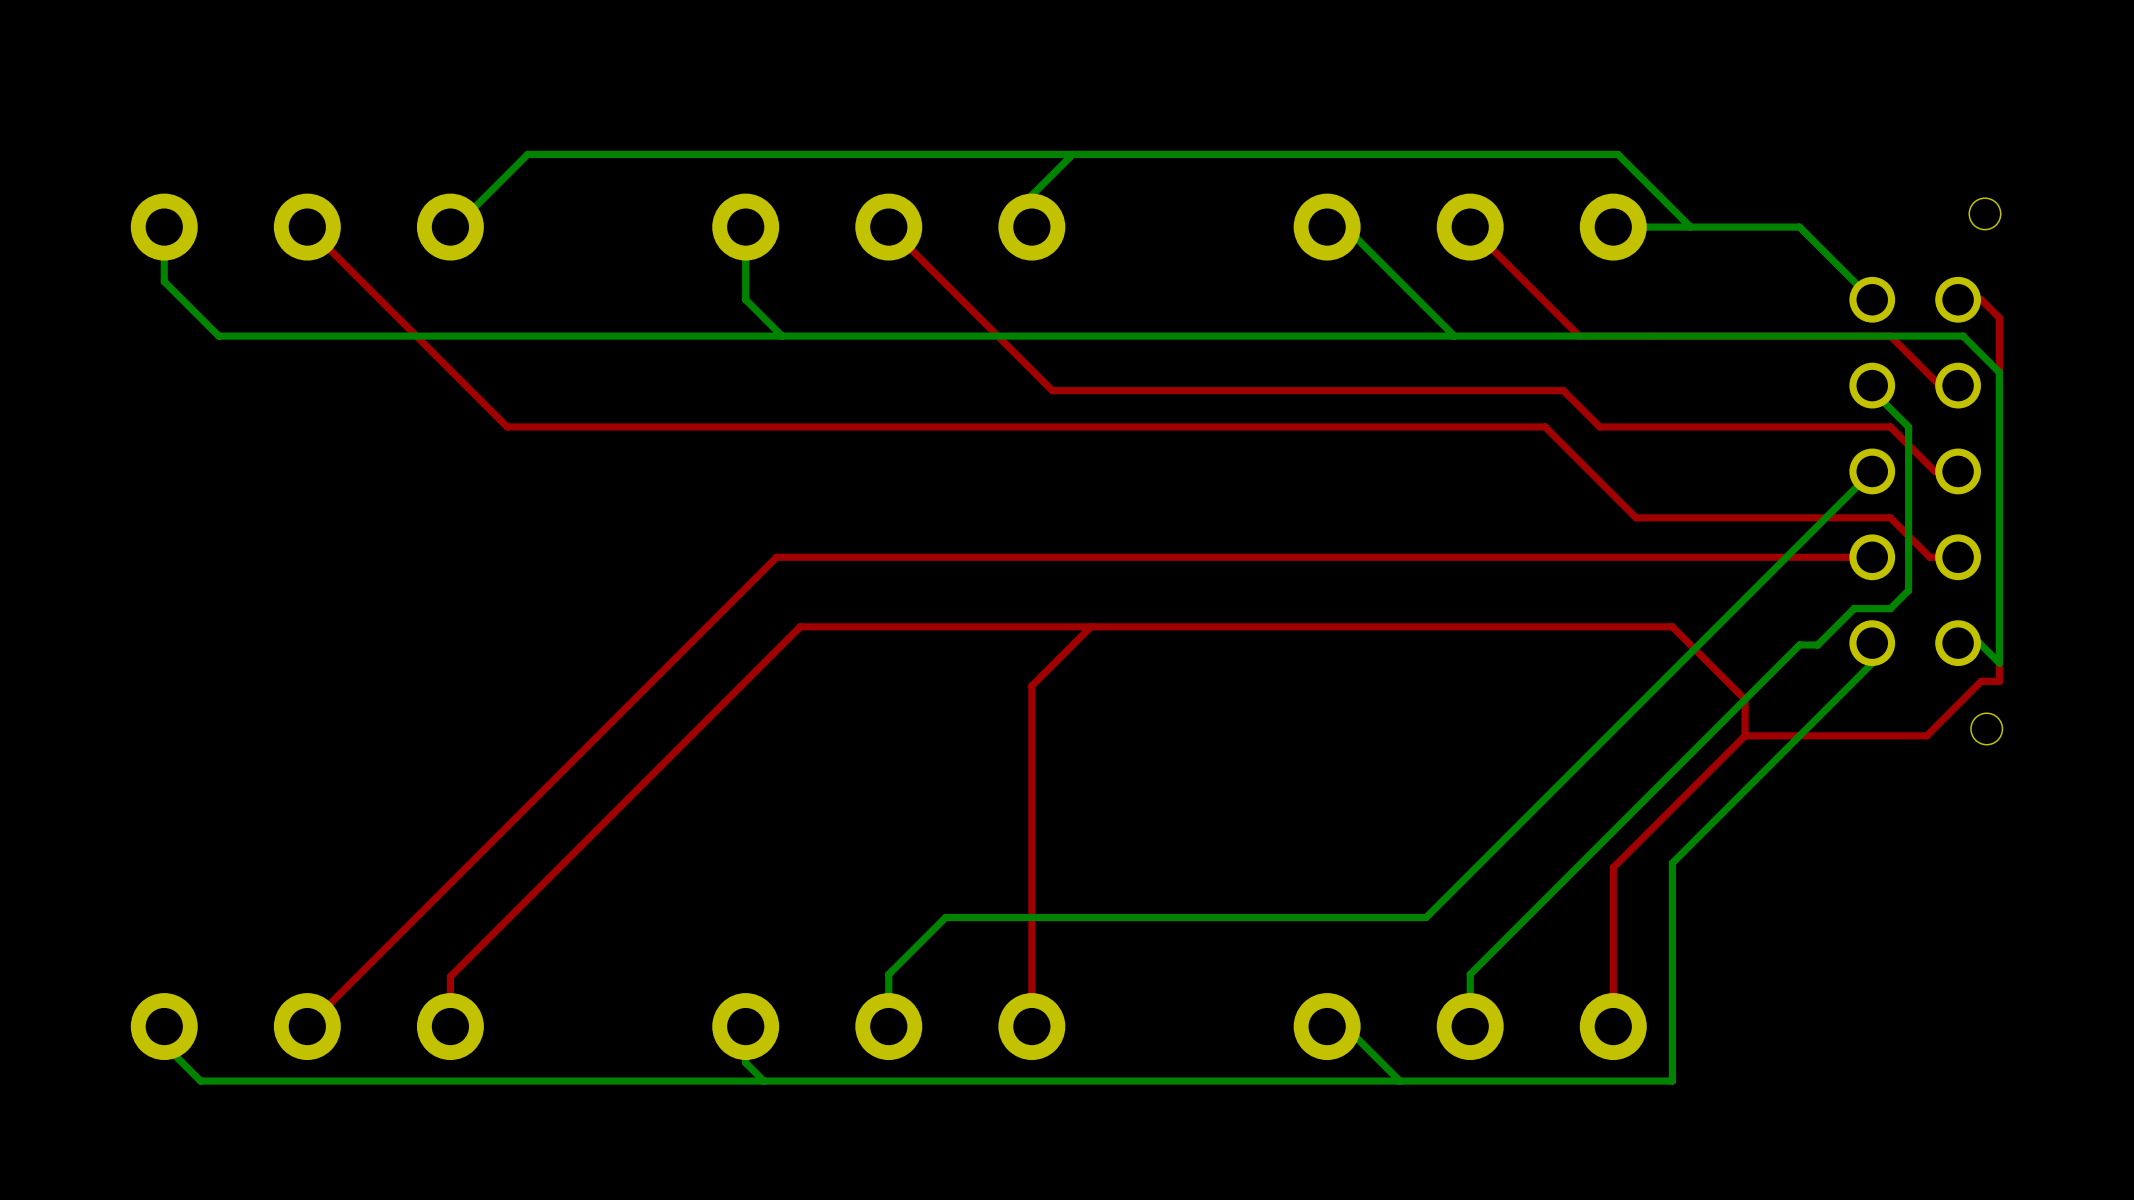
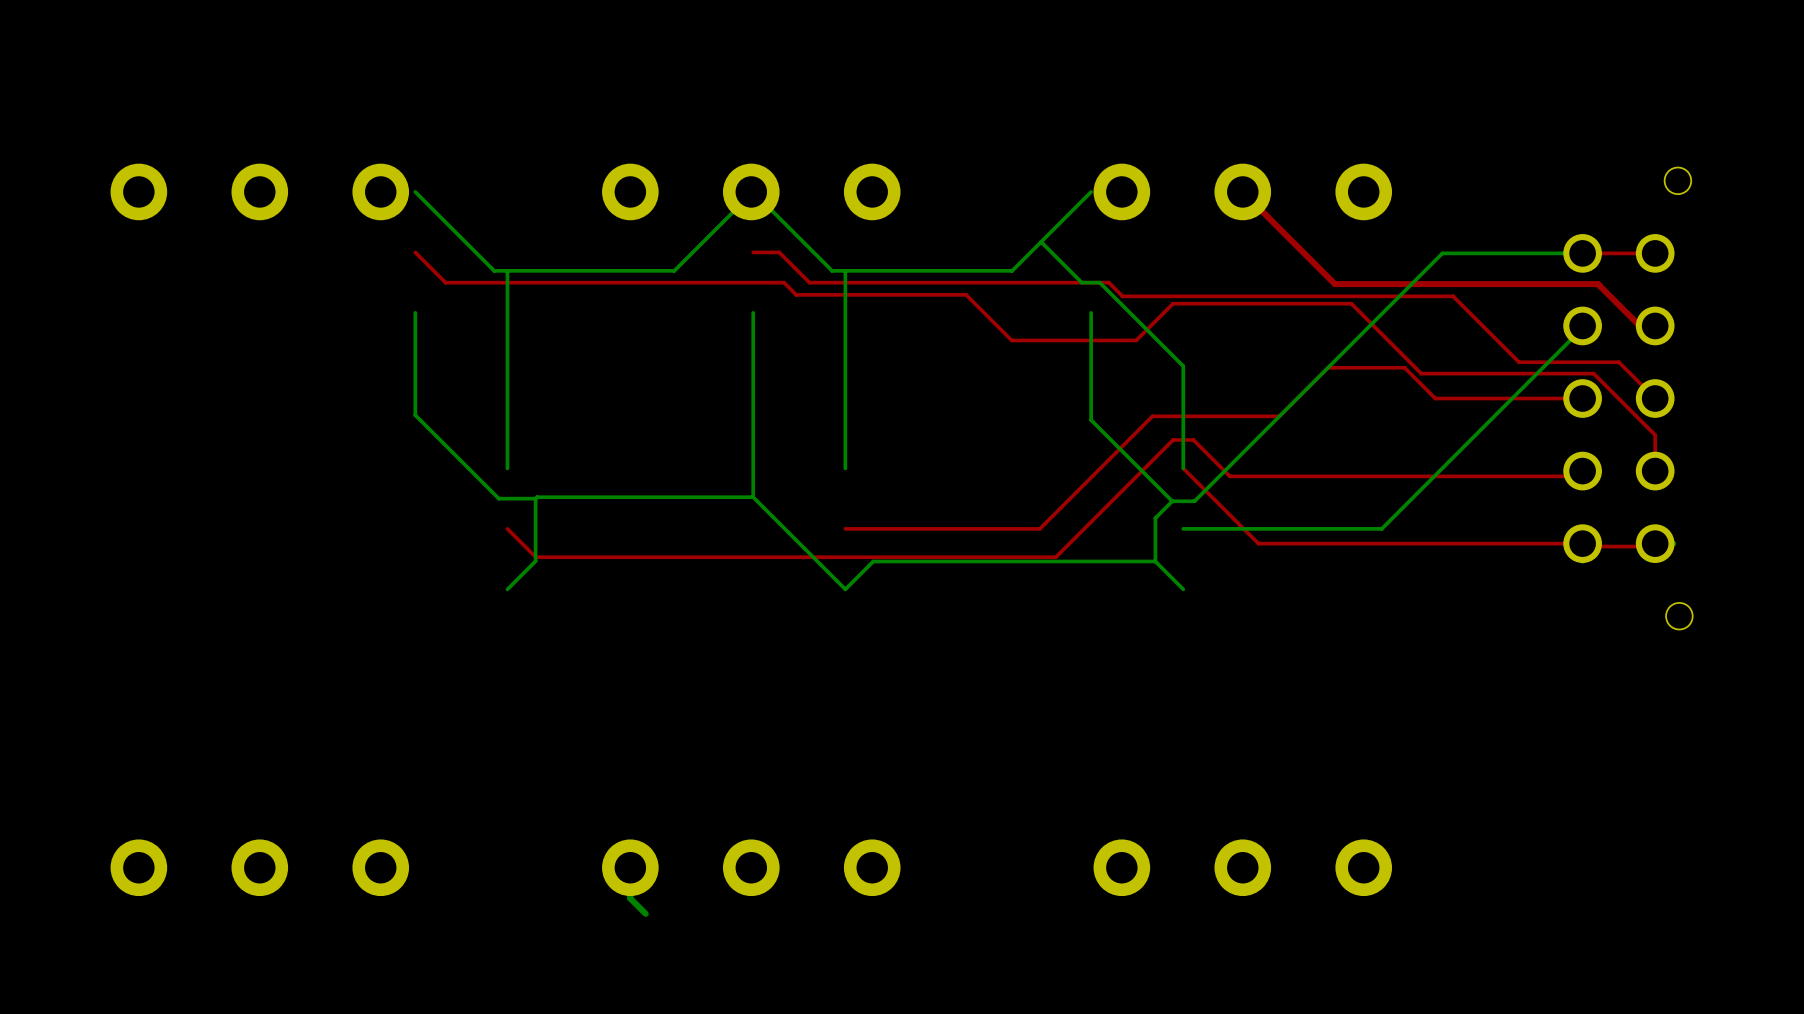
bottom track: (1072, 154) (1031, 195) (1031, 227) -> none
bottom track: (164, 227) (164, 281) (218, 336) (1963, 336) (1999, 372) (1999, 663) (1979, 643) -> none
top track: (307, 227) (507, 426) (1545, 426) (1636, 517) (1890, 517) (1929, 557) (1958, 557) -> (415, 252) (445, 282) (784, 282) (796, 294) (966, 294) (1011, 340) (1136, 340) (1172, 303) (1351, 303) (1421, 373) (1593, 373) (1655, 435) (1655, 471)
bottom track: (745, 227) (745, 299) (782, 336) -> none
top track: (888, 227) (1052, 390) (1563, 390) (1599, 426) (1890, 426) (1934, 471) (1958, 471) -> (753, 252) (779, 252) (809, 282) (1108, 282) (1122, 296) (1453, 296) (1519, 362) (1618, 362) (1655, 398)
bottom track: none -> (1091, 191) (1012, 270) (832, 270) (753, 191) (674, 270) (494, 270) (415, 191)
bottom track: (1327, 227) (1345, 227) (1454, 336) -> none
bottom track: (1613, 227) (1799, 227) (1872, 299) -> (1172, 501) (1194, 501) (1442, 253) (1582, 253)
bottom track: (1690, 227) (1617, 154) (527, 154) (454, 227) (450, 227) -> none
bottom track: none -> (1041, 241) (1081, 282) (1099, 282) (1183, 366) (1183, 468)
top track: (1958, 299) (1981, 299) (1999, 317) (1999, 681) (1981, 681) (1926, 735) (1745, 735) -> (1655, 253) (1582, 253)
bottom track: none -> (507, 270) (507, 468)
bottom track: none -> (845, 270) (845, 468)
bottom track: none -> (415, 312) (415, 415) (498, 498) (535, 498)
bottom track: none -> (753, 312) (753, 497)
bottom track: none -> (1091, 312) (1091, 420) (1172, 501)
bottom track: none -> (1582, 328) (1381, 528) (1183, 528)
bottom track: (1872, 390) (1908, 426) (1908, 590) (1890, 608) (1854, 608) (1817, 644) (1799, 644) (1470, 974) (1470, 1026) -> none
top track: none -> (1574, 398) (1435, 398) (1404, 367) (1327, 367) (1279, 416) (1152, 416) (1039, 528) (845, 528)
bottom track: (1872, 471) (1426, 917) (945, 917) (888, 974) (888, 1026) -> none
top track: none -> (1183, 468) (1258, 543) (1582, 543) (1585, 546) (1655, 546)
top track: (1872, 557) (776, 557) (307, 1026) -> (1582, 471) (1577, 476) (1229, 476) (1193, 439) (1173, 439) (1055, 557) (535, 557) (507, 528)
bottom track: none -> (753, 497) (535, 498)
bottom track: none -> (753, 497) (845, 589) (873, 561) (1155, 561)
bottom track: none -> (535, 498) (535, 561) (507, 589)
bottom track: none -> (1172, 501) (1155, 518) (1155, 561)
top track: (1090, 626) (1031, 685) (1031, 1026) -> none
bottom track: (1872, 663) (1672, 863) (1672, 1081) (200, 1081) (164, 1044) (164, 1026) -> none
bottom track: none -> (1155, 561) (1183, 589)
top track: (1745, 735) (1745, 699) (1672, 626) (800, 626) (450, 976) (450, 1026) -> none
top track: (1745, 735) (1613, 867) (1613, 1026) -> none
bottom track: (1327, 1026) (1345, 1026) (1399, 1081) -> none

